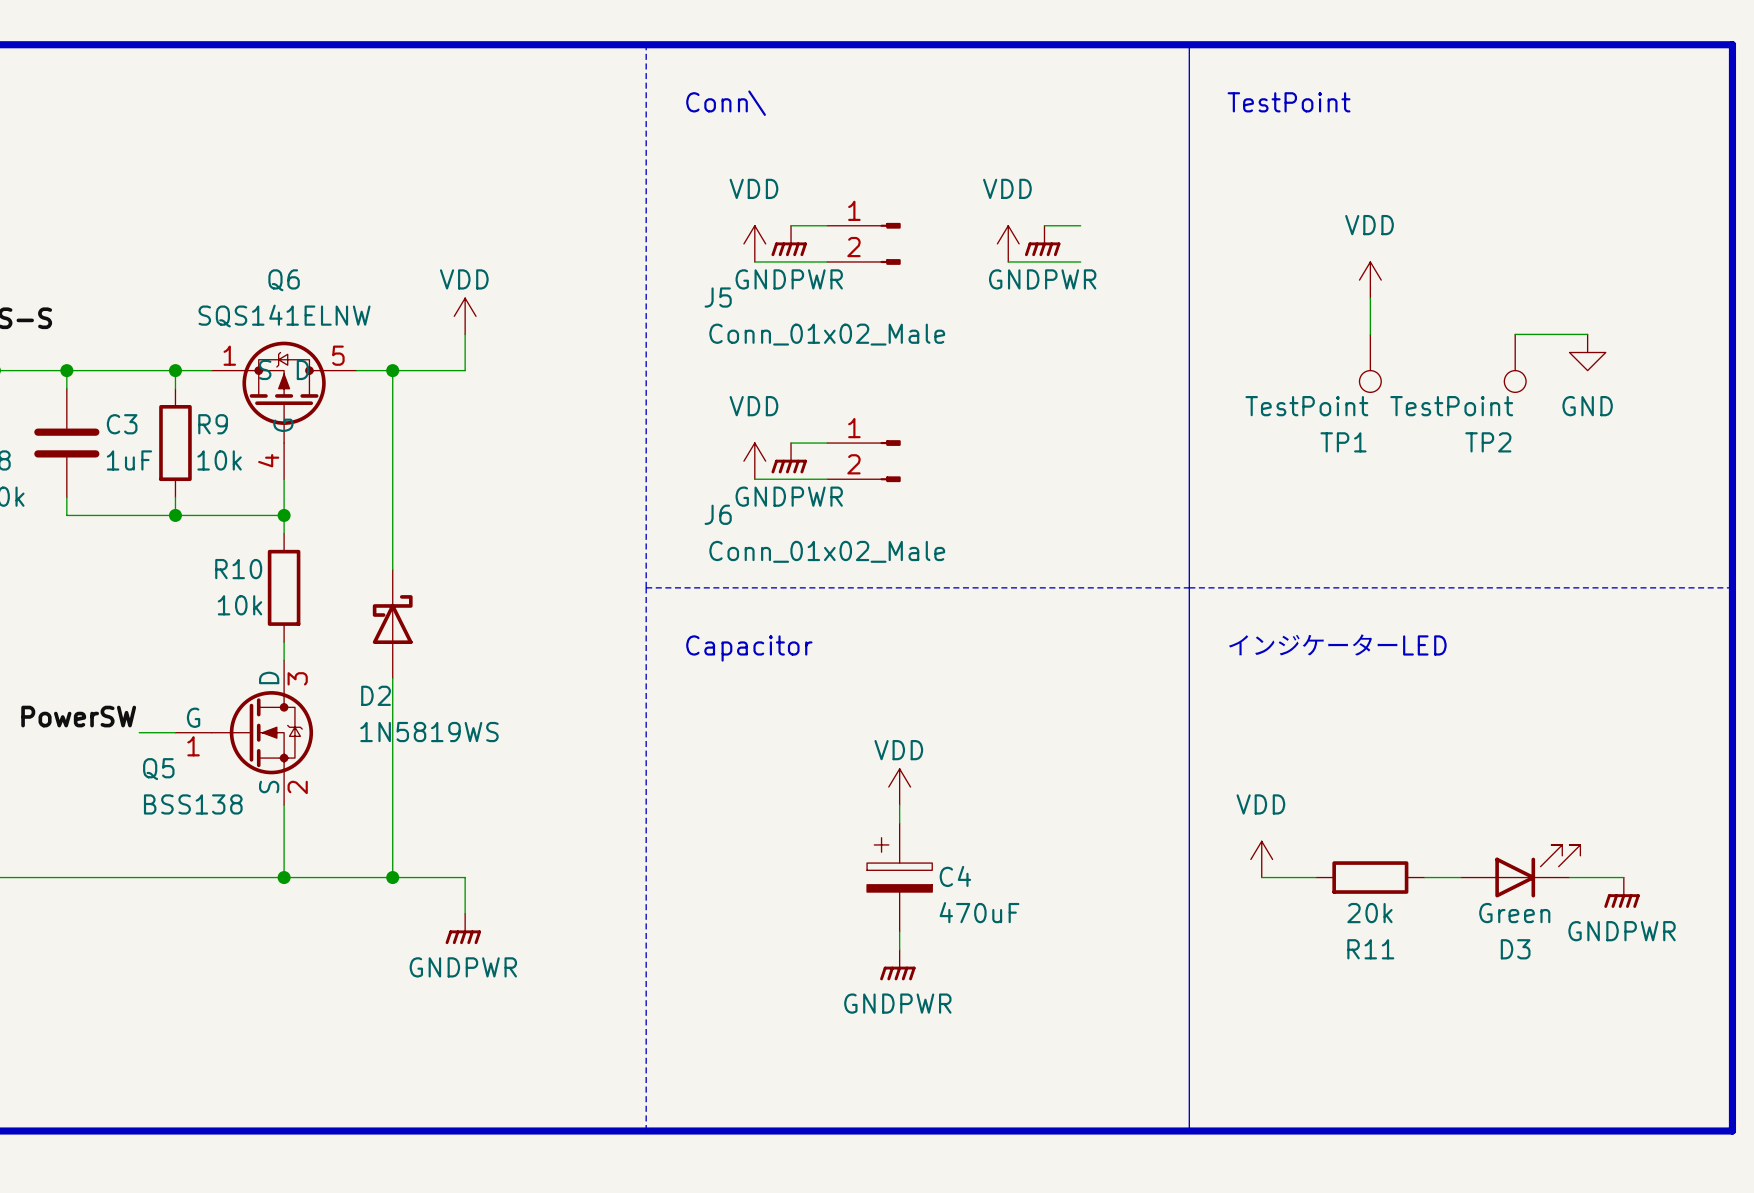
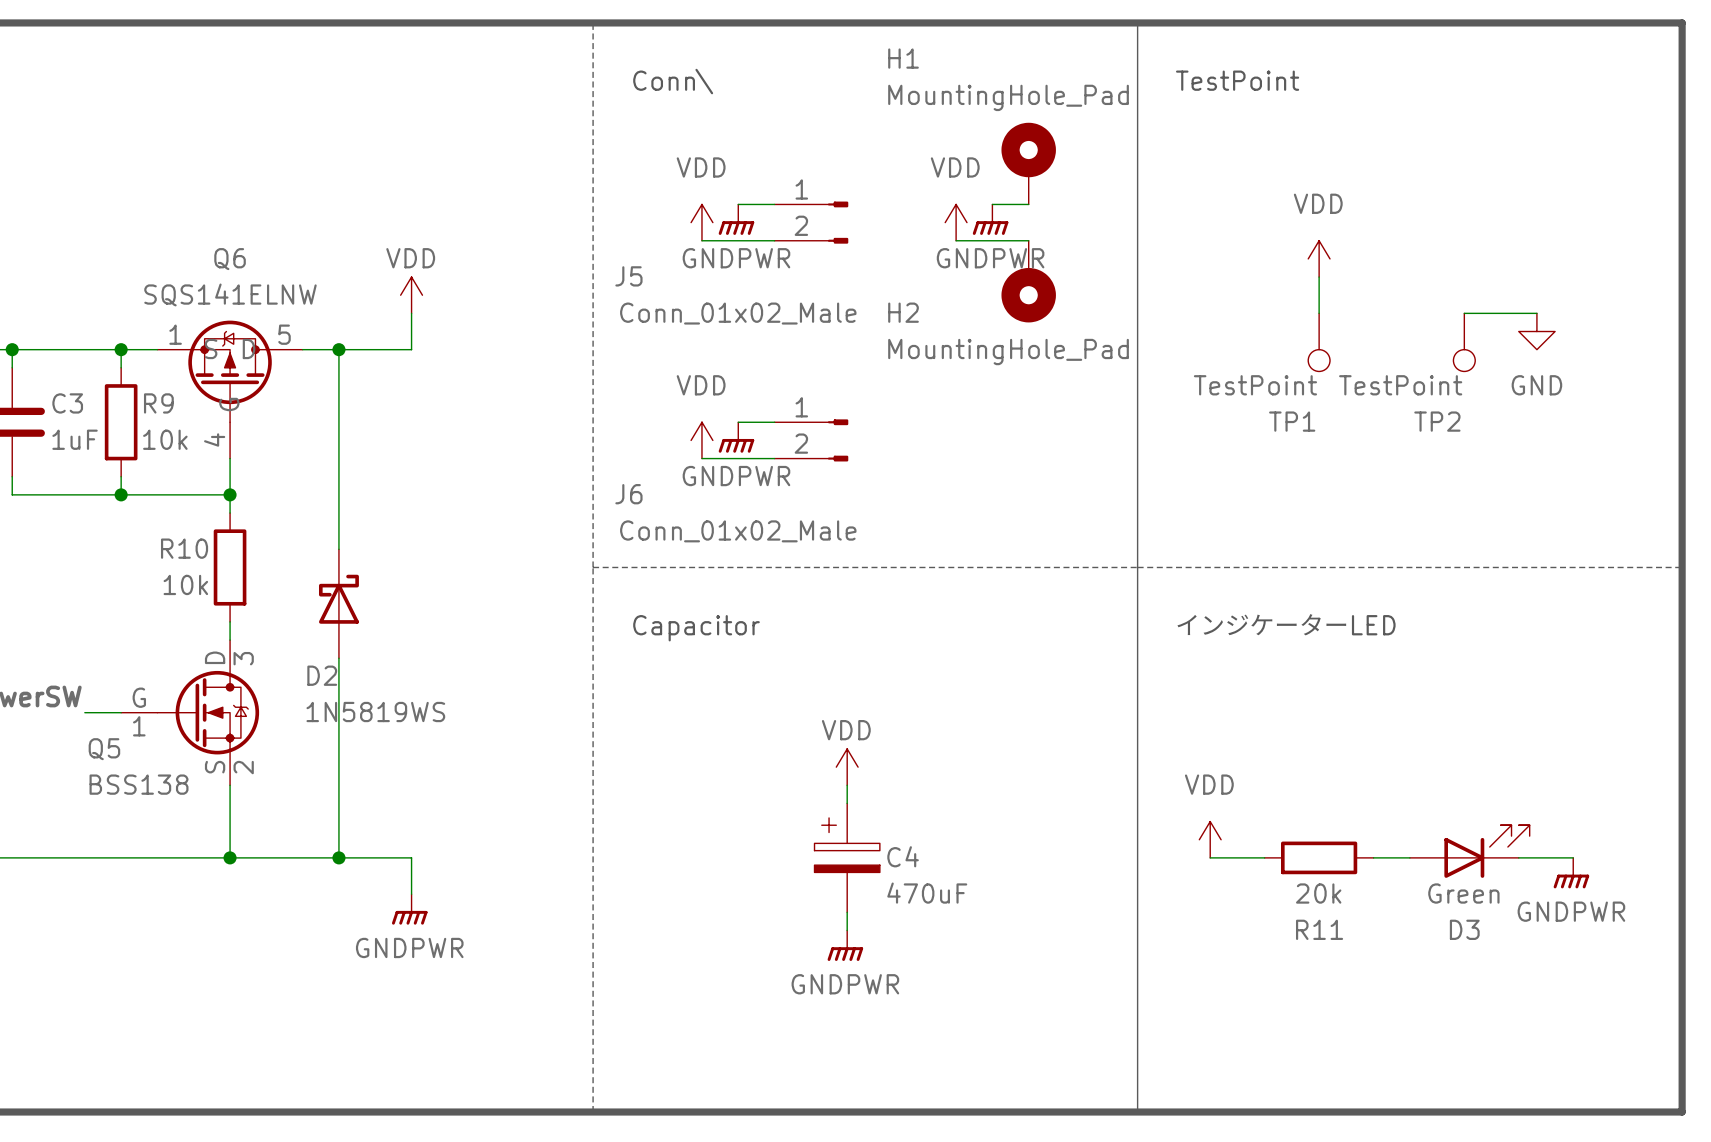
H1: none -> MountingHole_Pad (1028, 163)
J5 name position: J5 (718, 297) -> J5 (628, 276)
H2: none -> MountingHole_Pad (1028, 281)
J5 value position: Conn_01x02_Male (827, 334) -> Conn_01x02_Male (738, 313)
J6 name position: J6 (718, 514) -> J6 (628, 494)
J6 value position: Conn_01x02_Male (827, 551) -> Conn_01x02_Male (738, 531)

